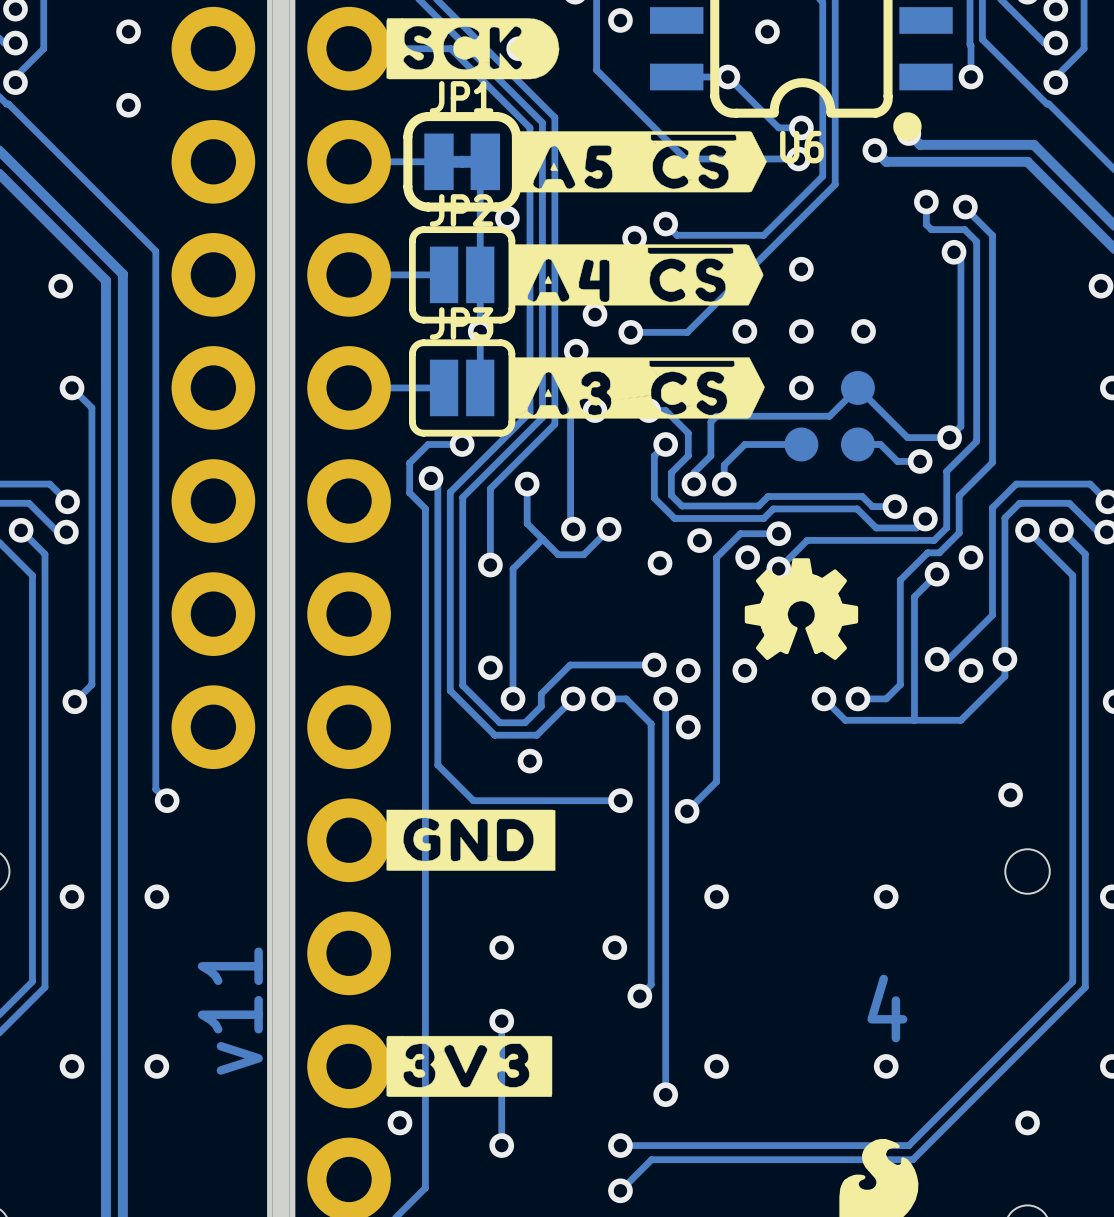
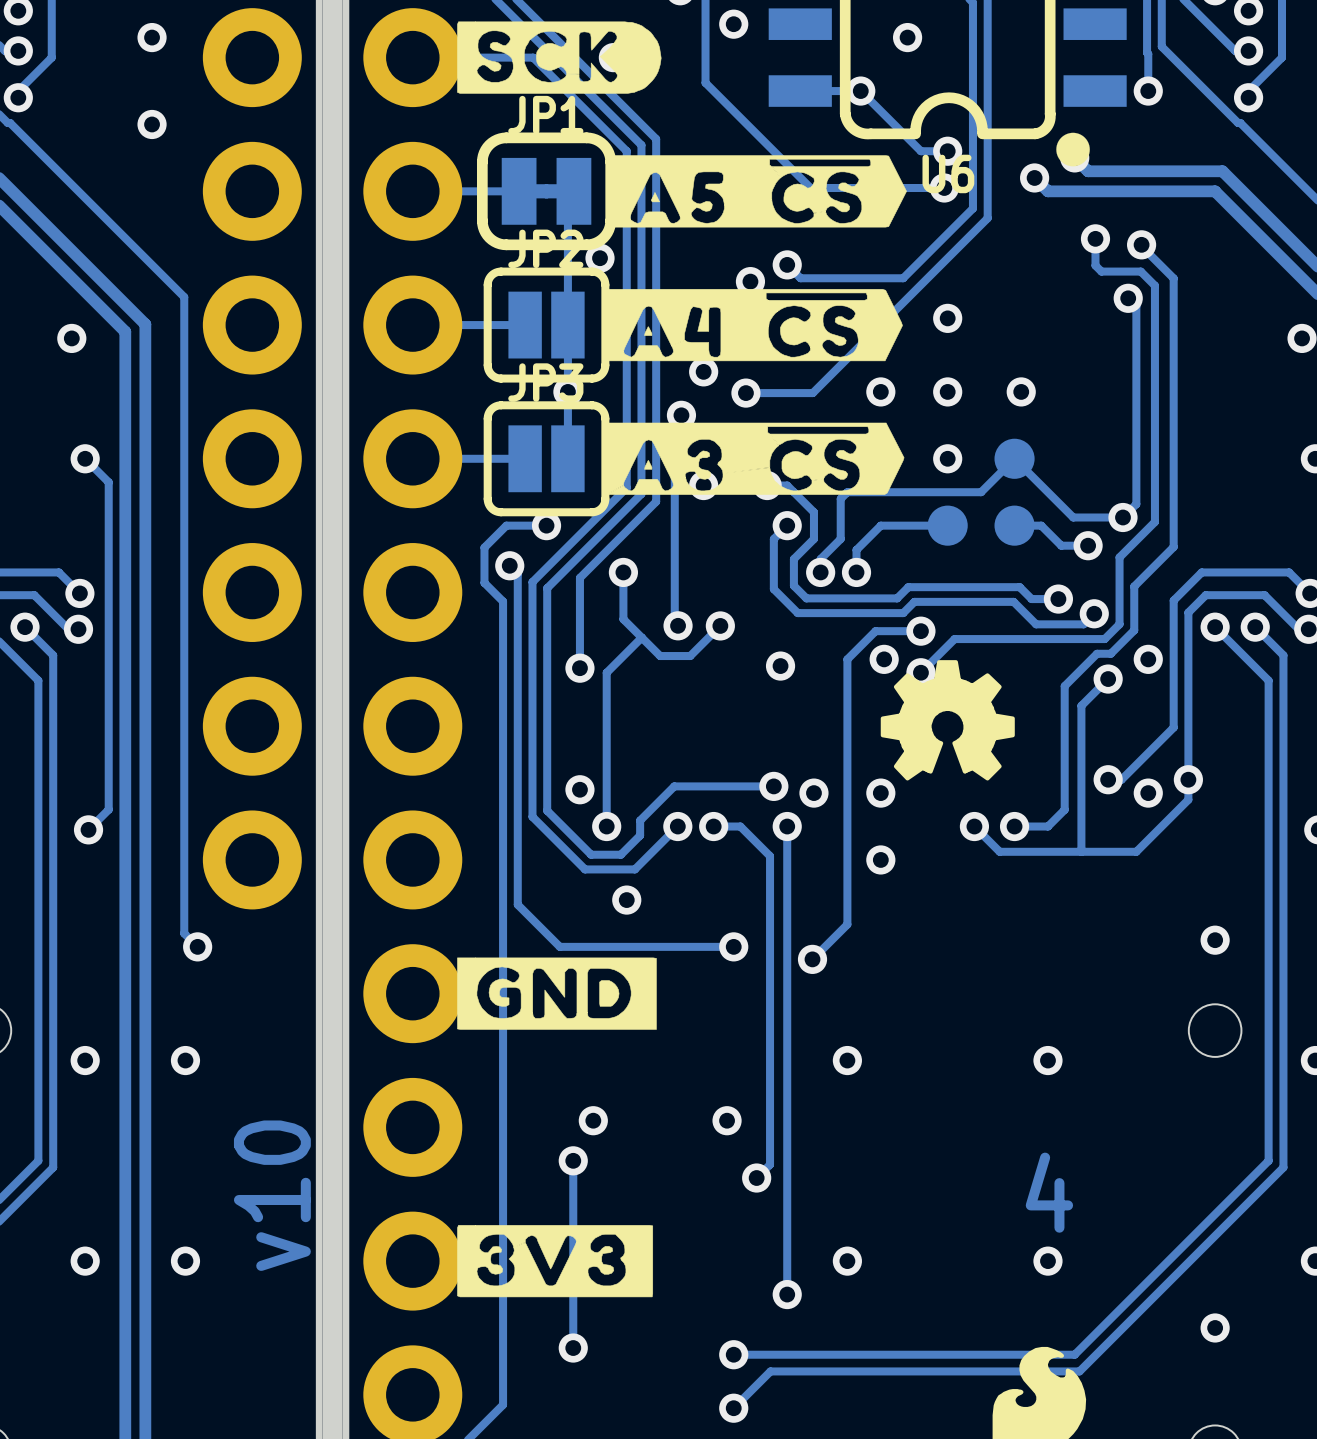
via: (699, 540) -> none
via position: (688, 727) -> (880, 859)
via position: (1010, 795) -> (1215, 940)
track: none -> (573, 1160) (573, 1348)
text: v11 (230, 1011) -> v10 (272, 1195)
track: (501, 1021) (501, 1145) -> none
via position: (501, 1021) -> (573, 1160)
via: (399, 1122) -> none
via position: (501, 1145) -> (573, 1348)

